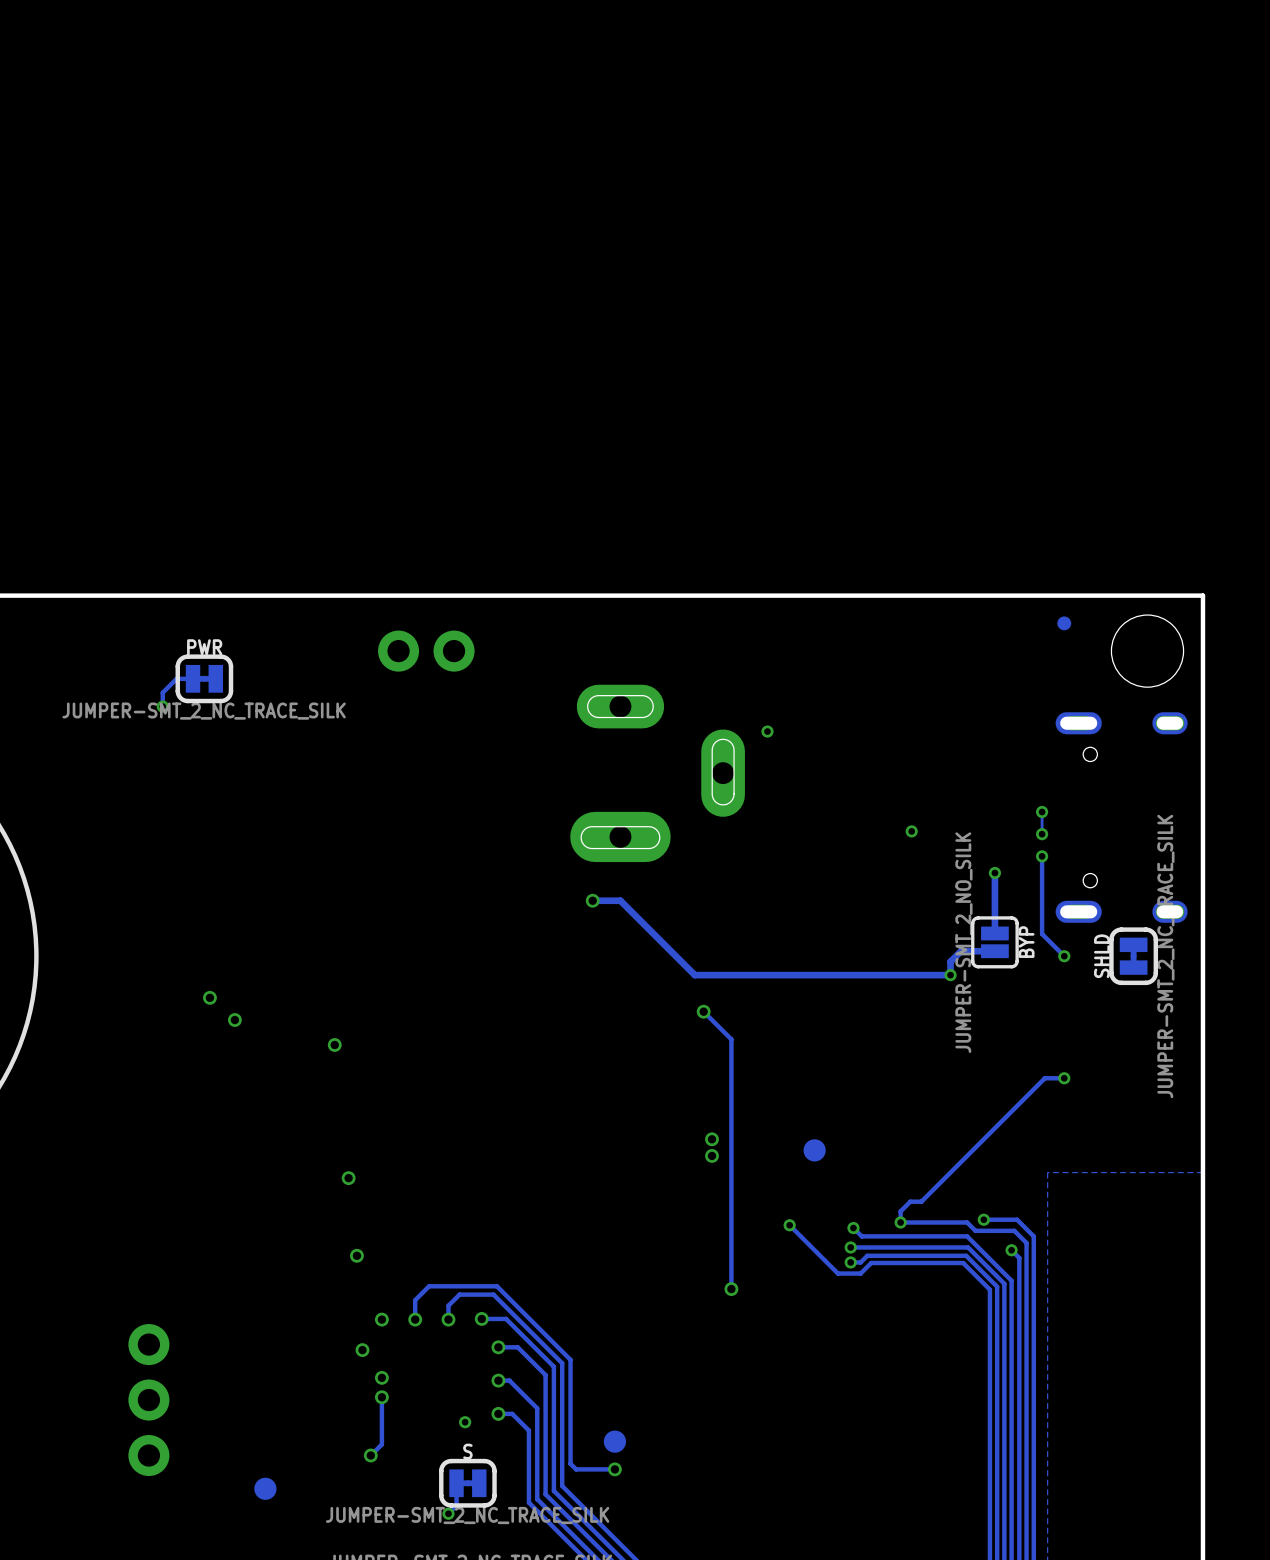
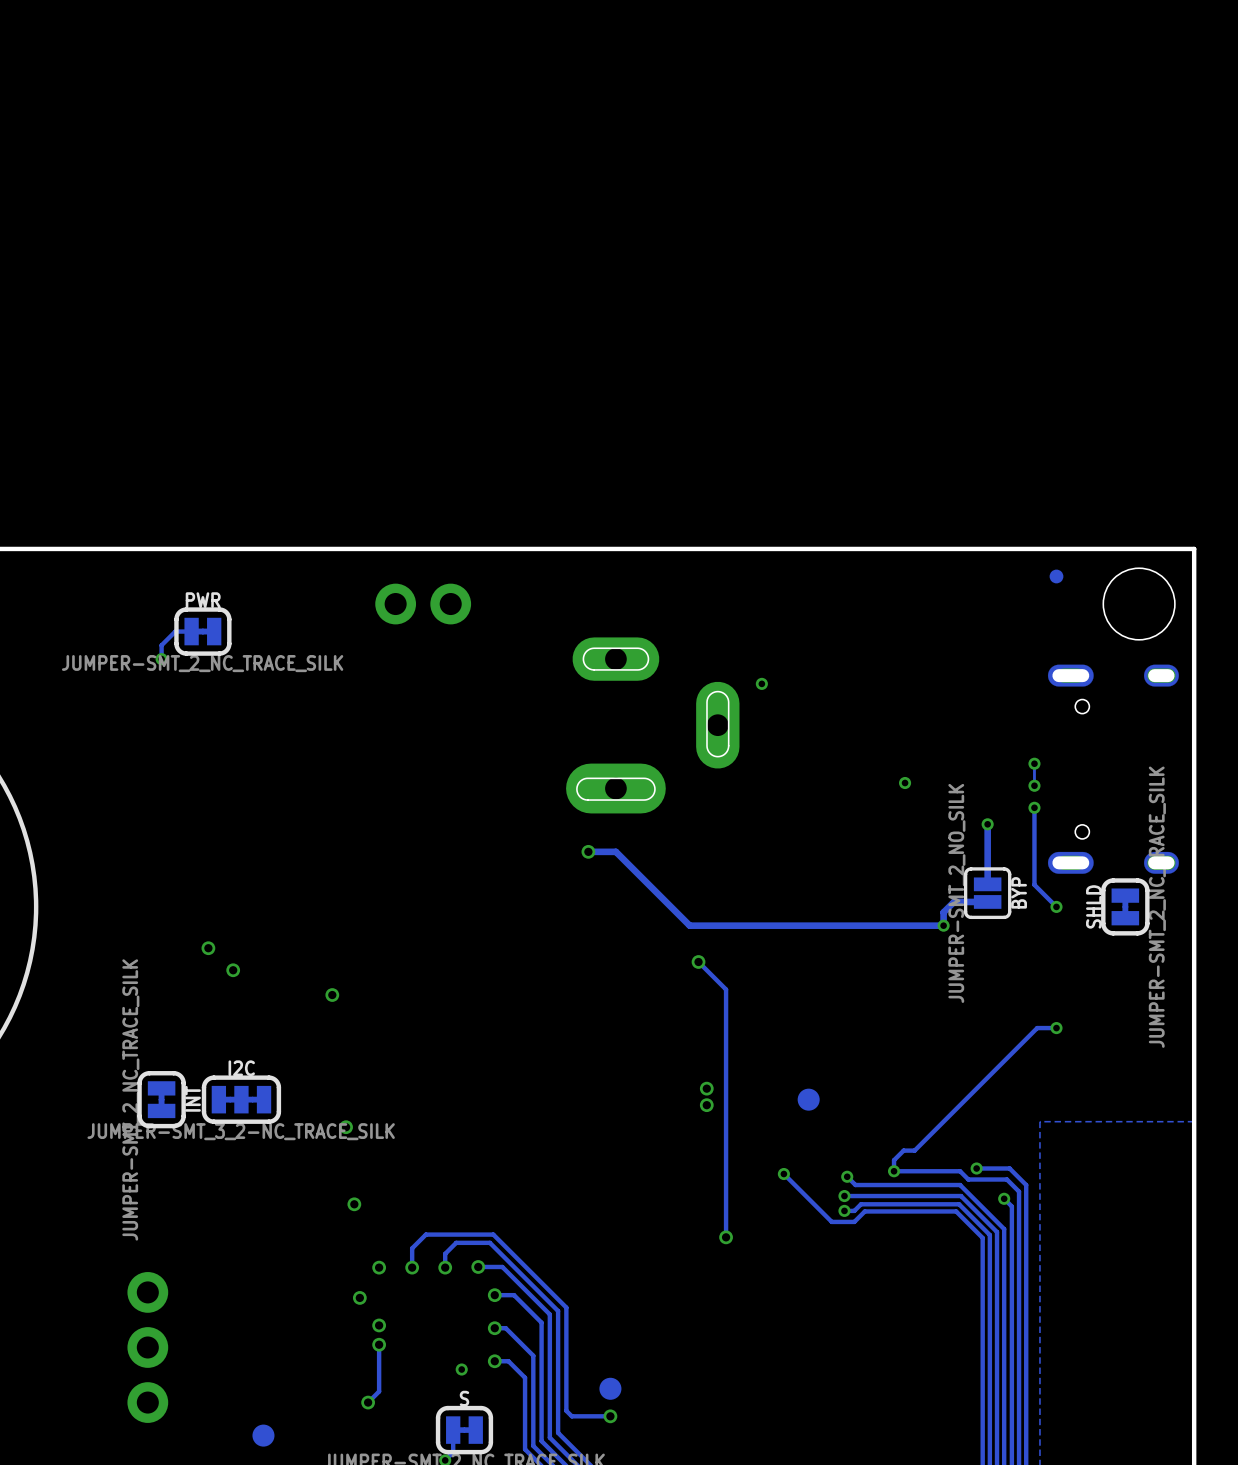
INT: none -> JUMPER-SMT_2_NC_TRACE_SILK (161, 1099)
I2C: none -> JUMPER-SMT_3_2-NC_TRACE_SILK (241, 1099)

